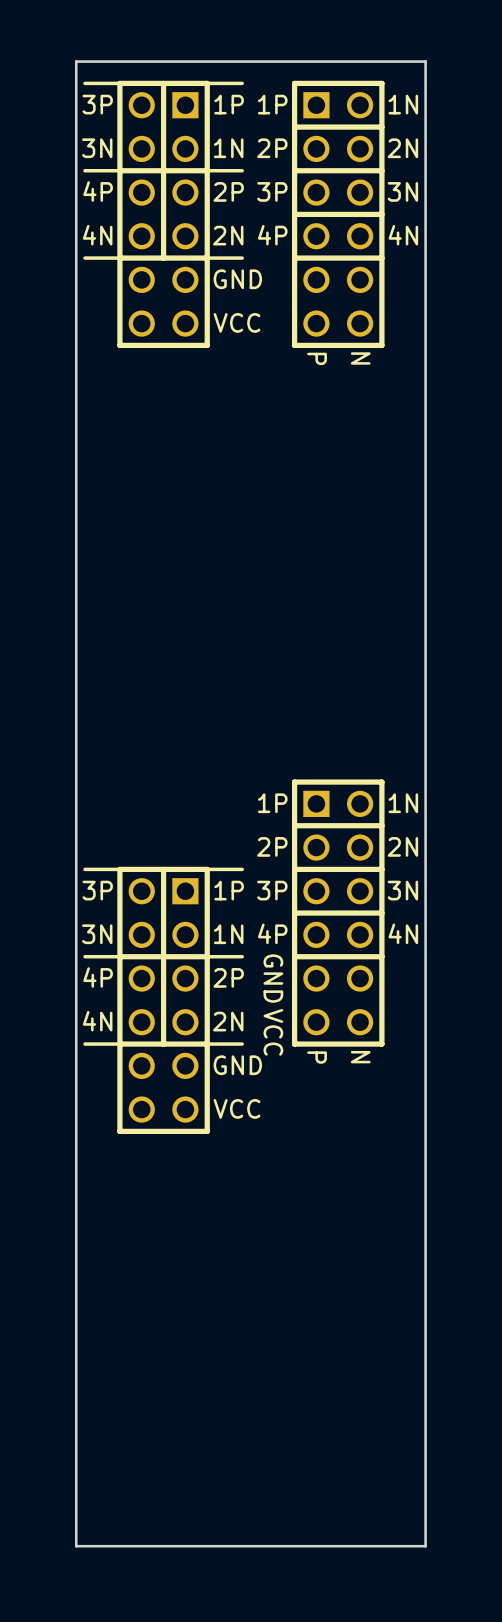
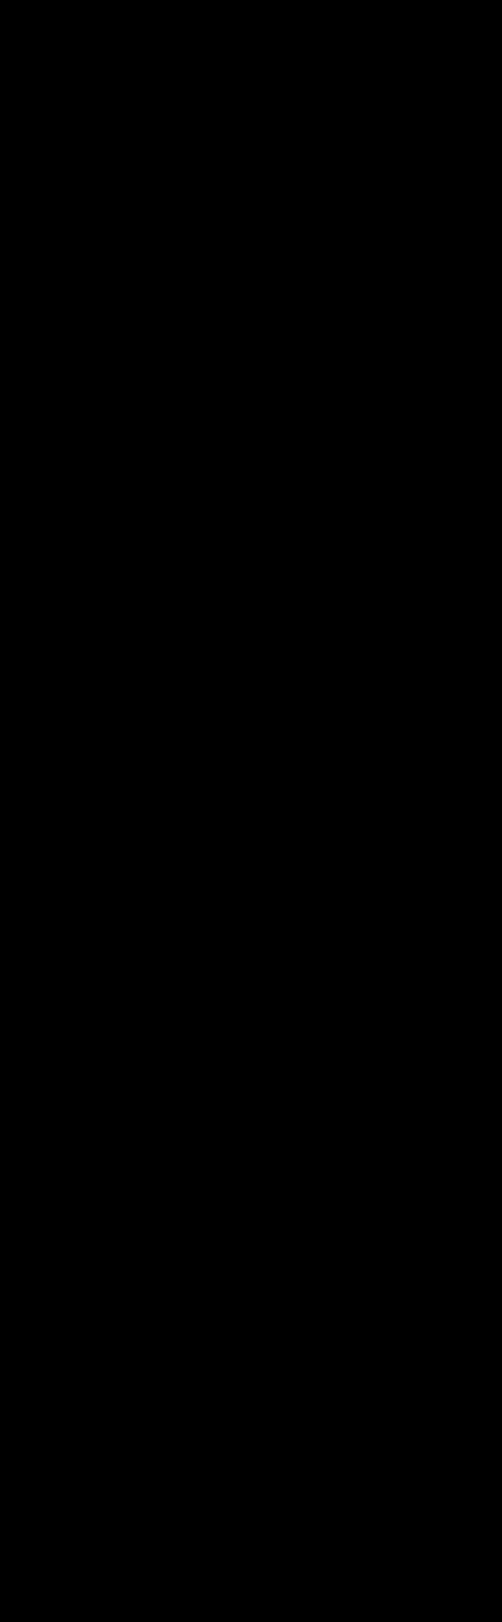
board edge: (425, 61) (425, 1546) (76, 1546) (76, 61) (425, 61) -> none
part: (163, 214) -> none
part: (338, 214) -> none
part: (338, 913) -> none
part: (163, 1000) -> none

